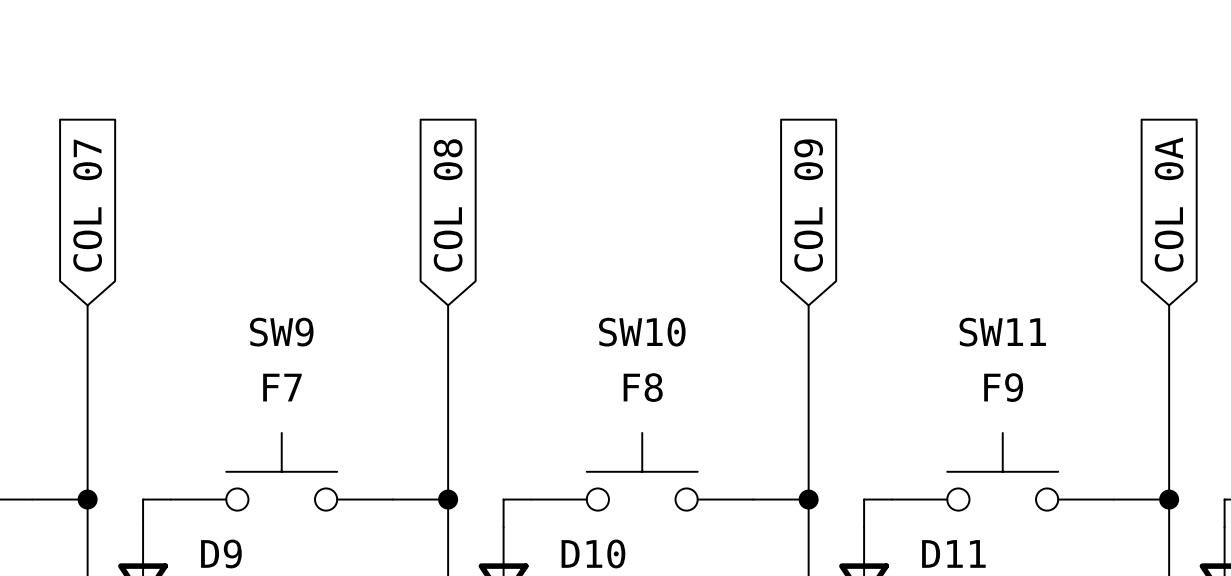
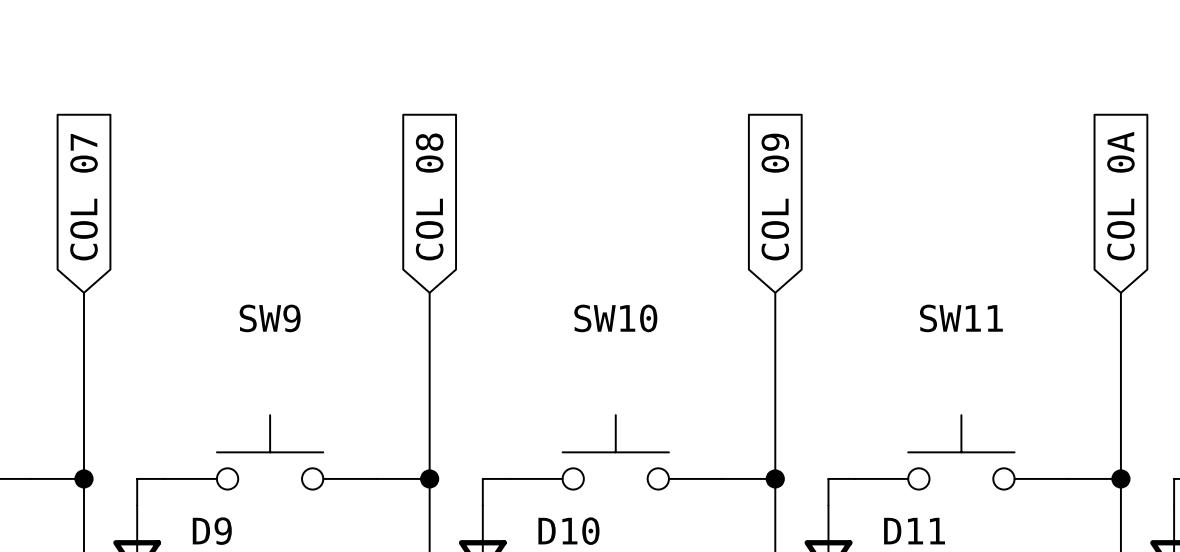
SW9 value: F7 (282, 387) -> none
SW10 value: F8 (643, 387) -> none
SW11 value: F9 (1003, 387) -> none

